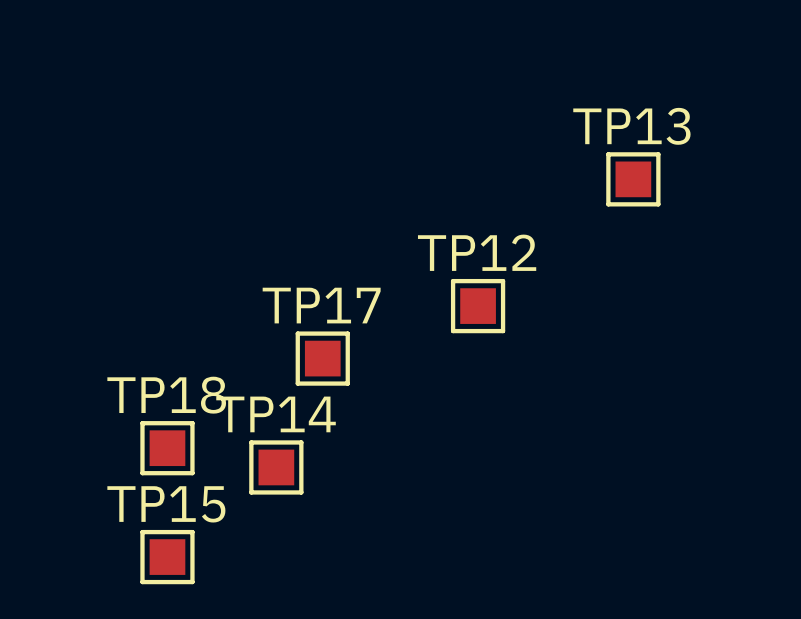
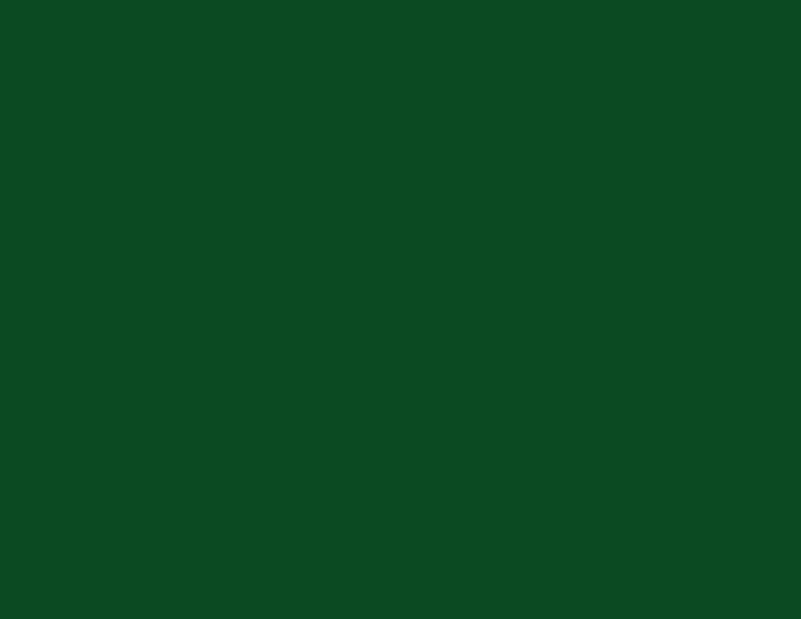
TP13: (633, 179) -> none
TP12: (478, 306) -> none
TP17: (322, 358) -> none
TP18: (167, 448) -> none
TP14: (276, 467) -> none
TP15: (167, 557) -> none

